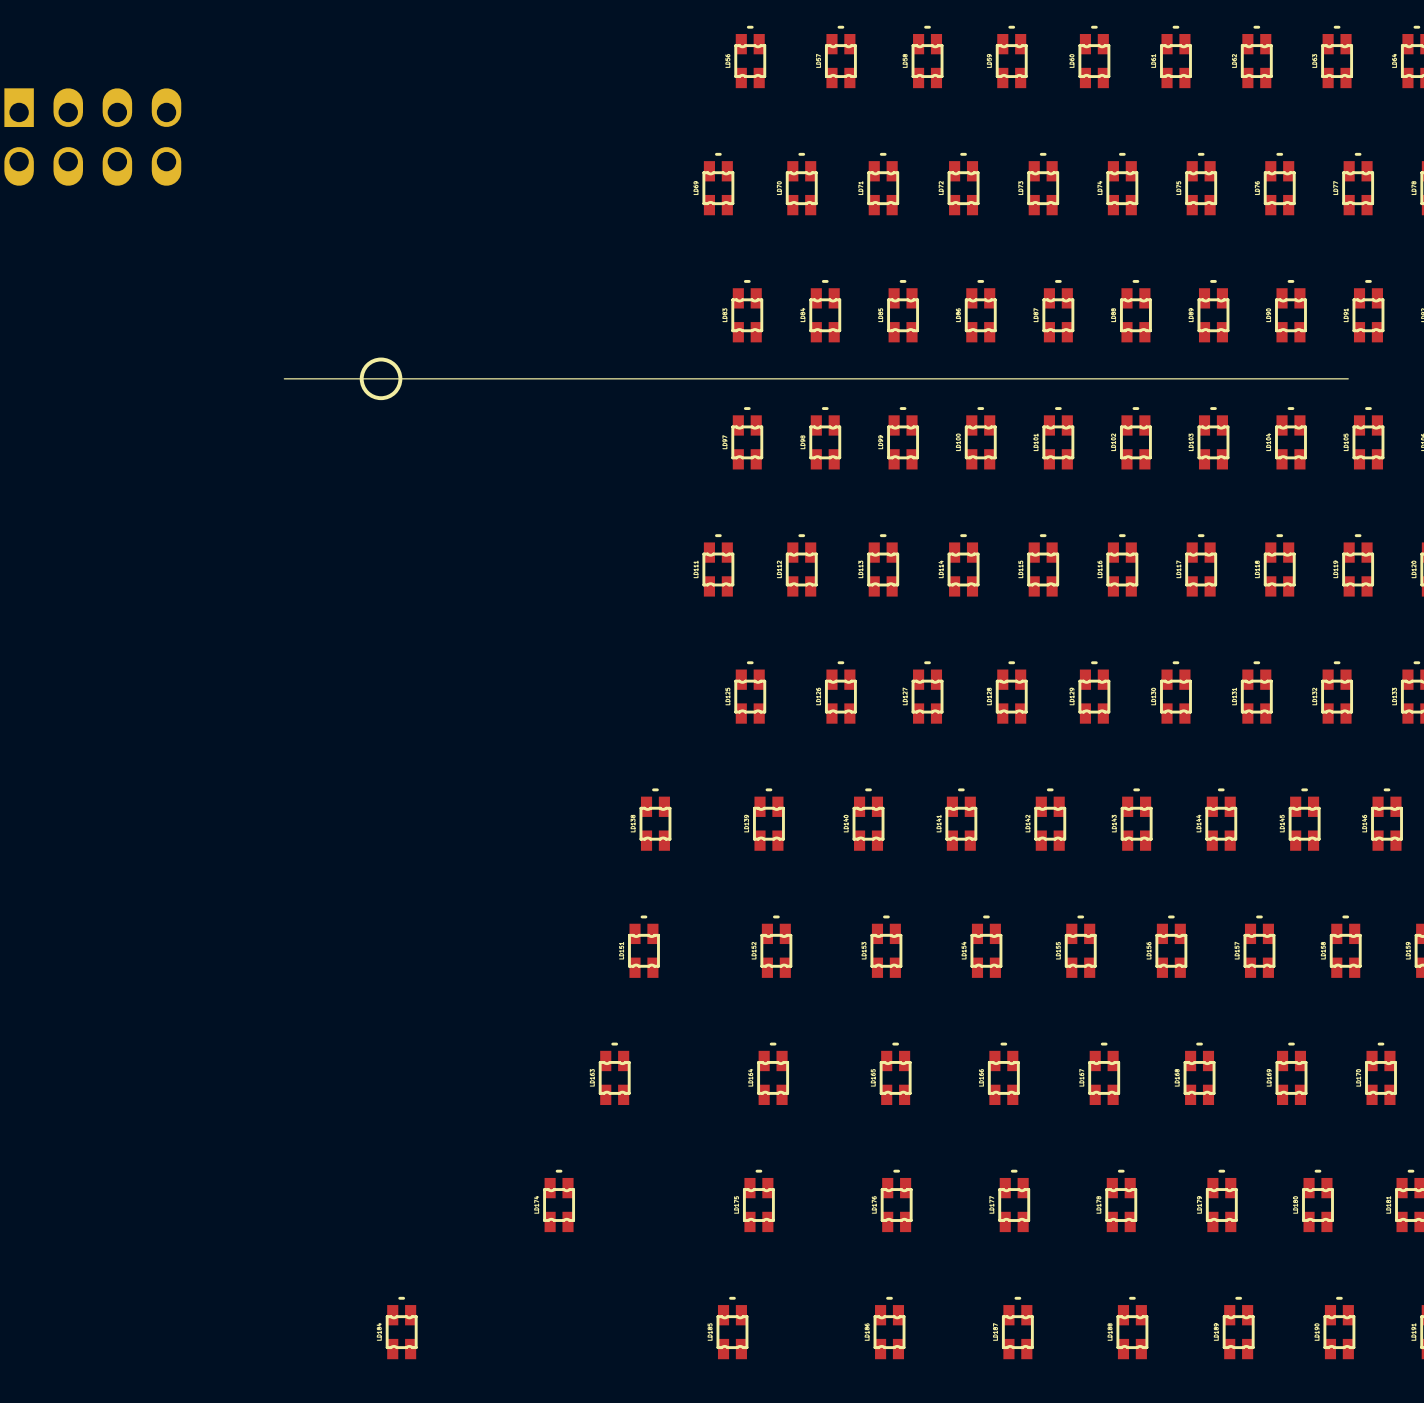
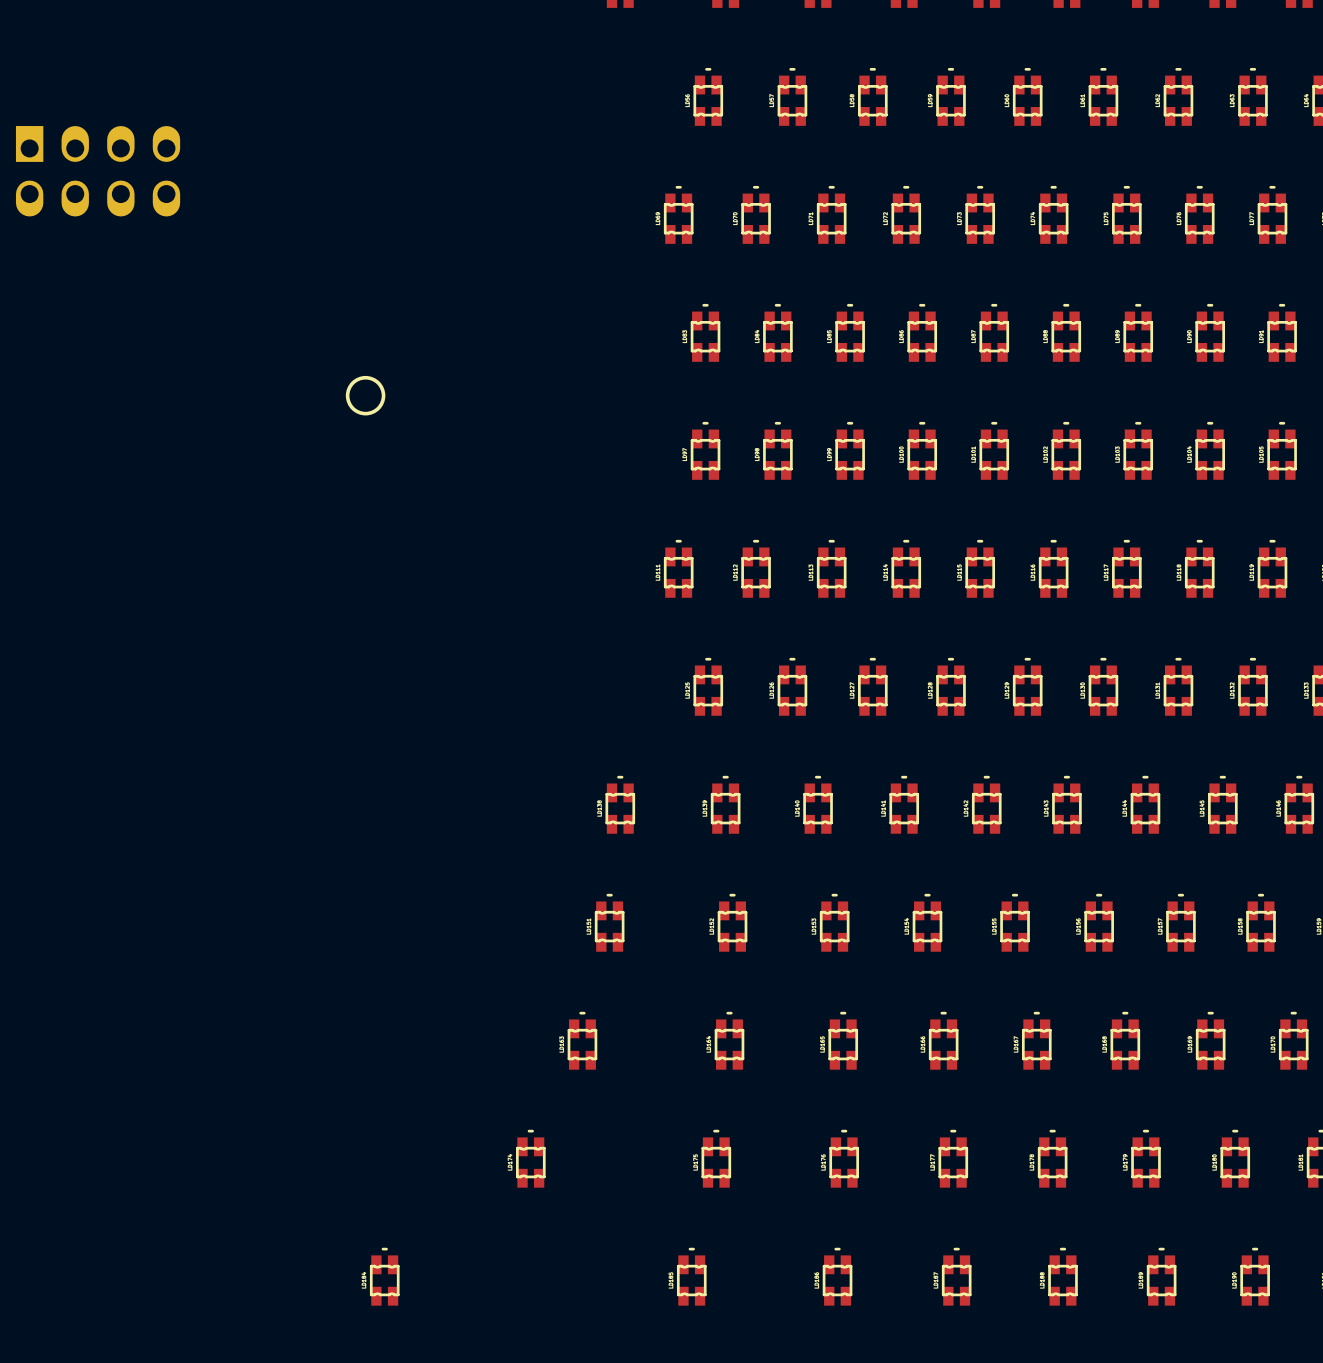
line: (284, 378) (1348, 378) -> none

